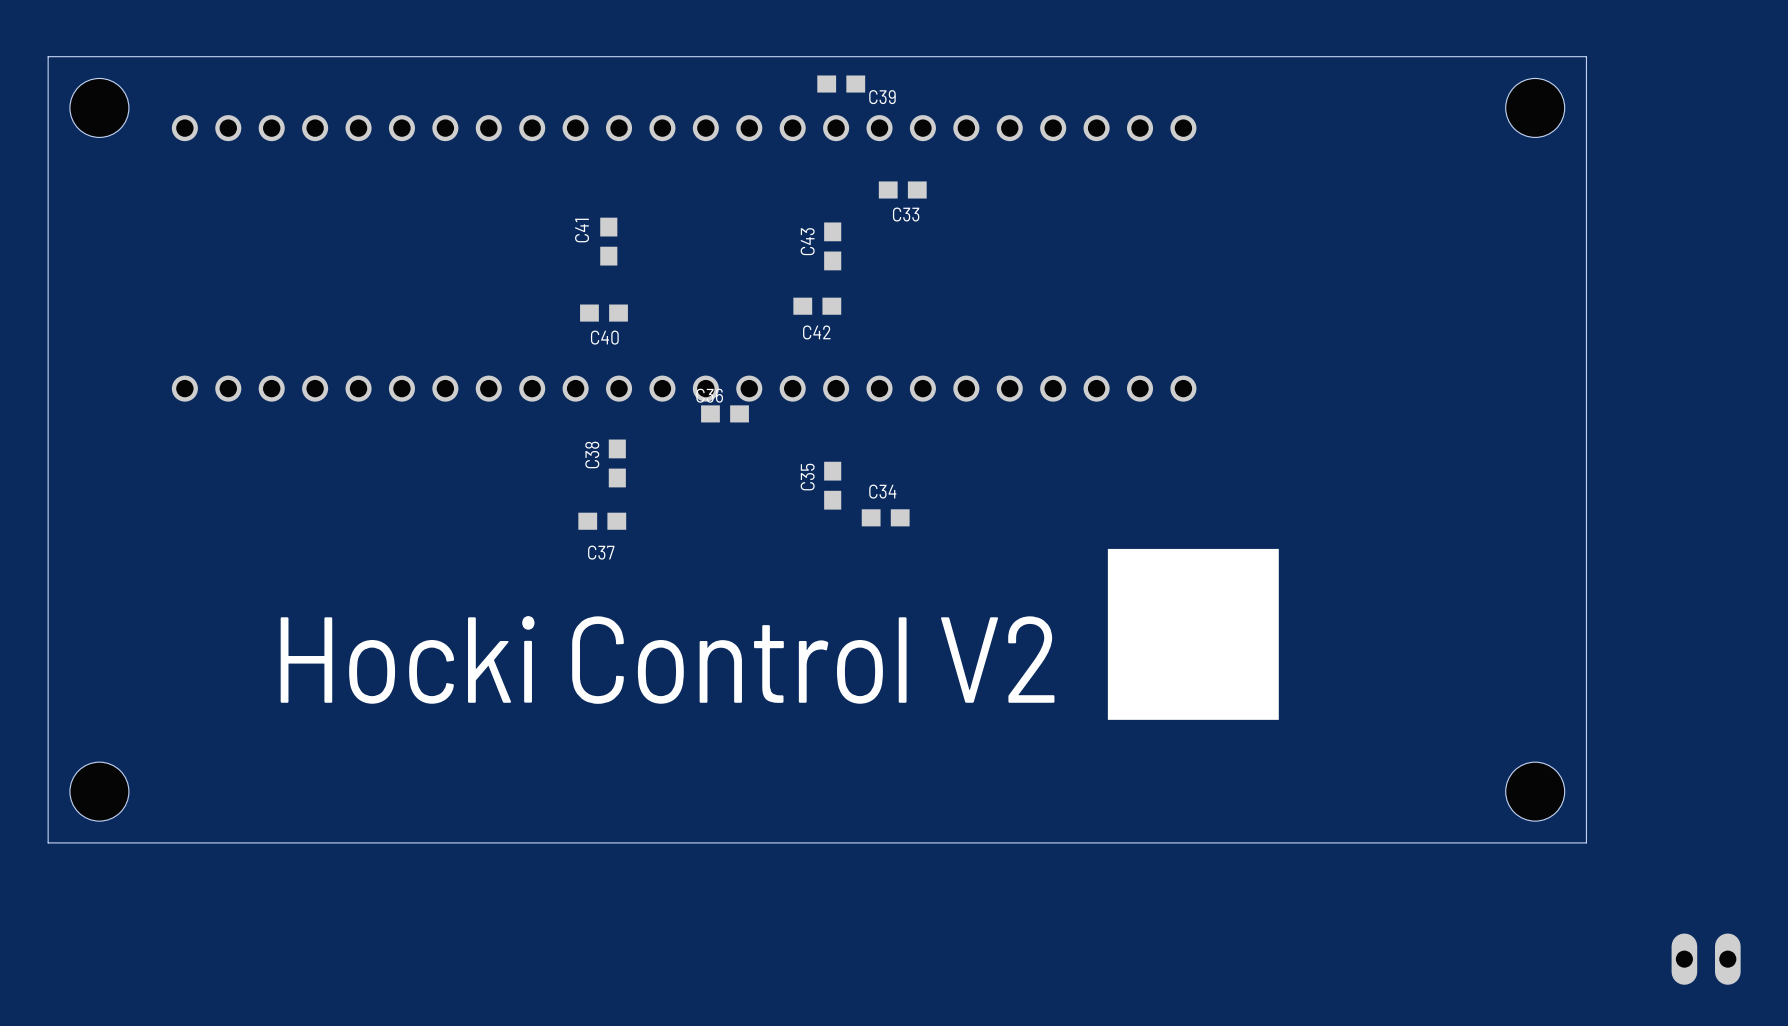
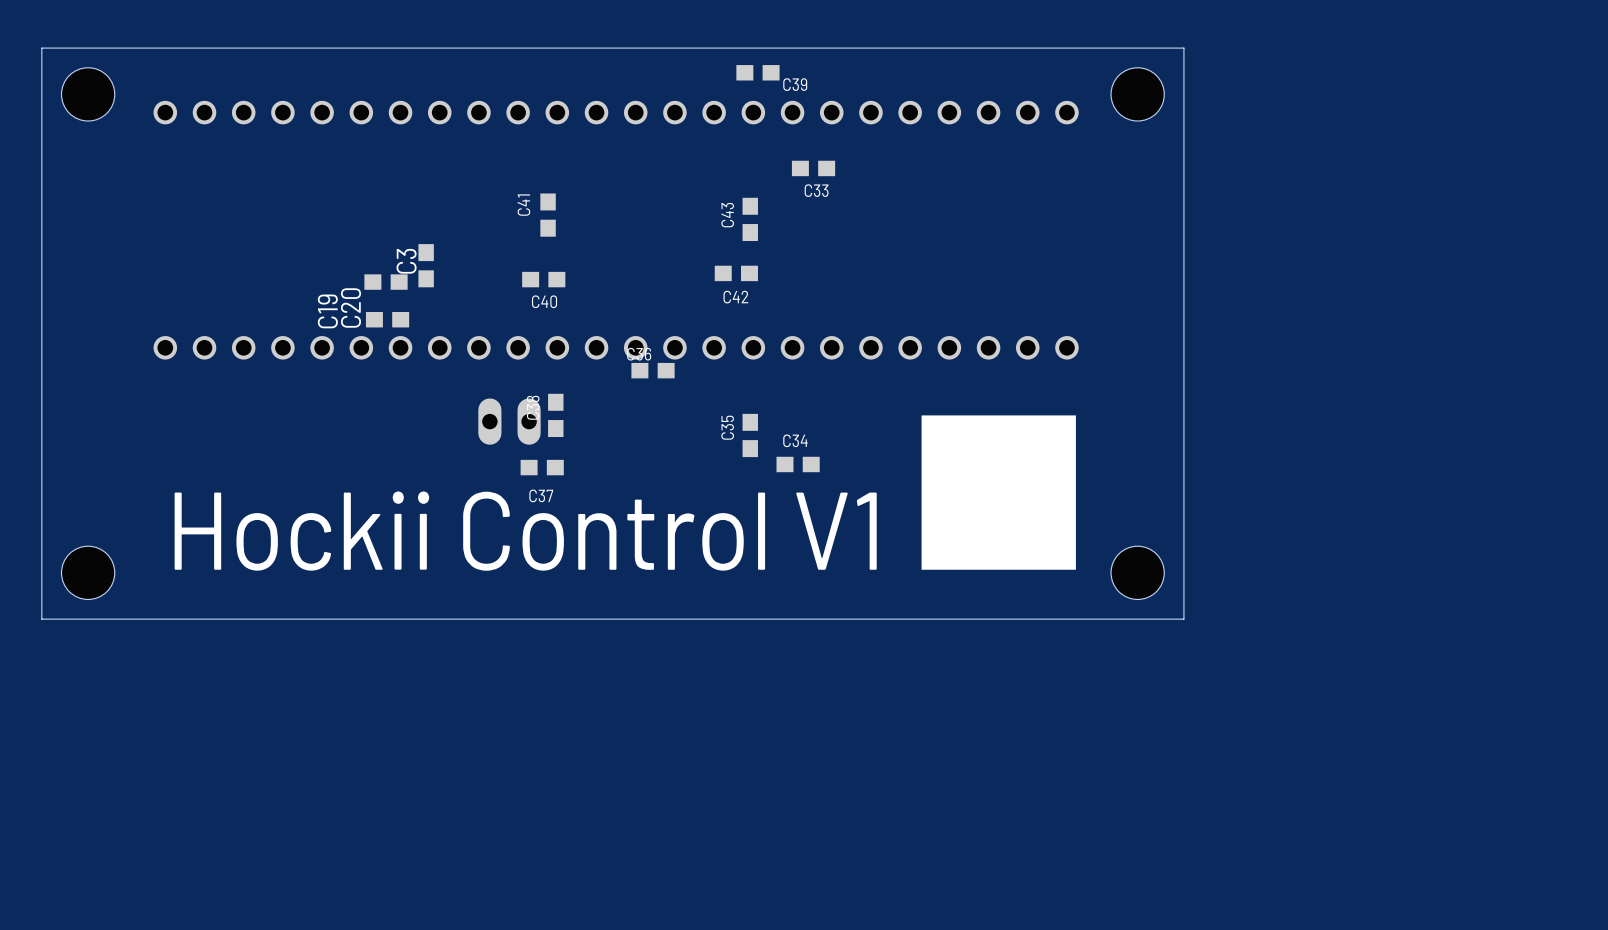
board edge: (1312, 56) (1586, 56) (1586, 842) (48, 842) (48, 689) -> (1183, 48) (1183, 619) (41, 619)
hole position: (1535, 107) -> (1137, 94)
C3: none -> (426, 265)
C19: none -> (386, 282)
C20: none -> (387, 319)
part: none -> (509, 421)
drawing position: (1193, 634) -> (998, 492)
hole: none -> (1137, 572)
text: Hocki Control V2 (667, 659) -> Hockii Control V1 (525, 531)
hole position: (99, 791) -> (88, 572)
hole: (1535, 791) -> none
part: (1706, 959) -> none

